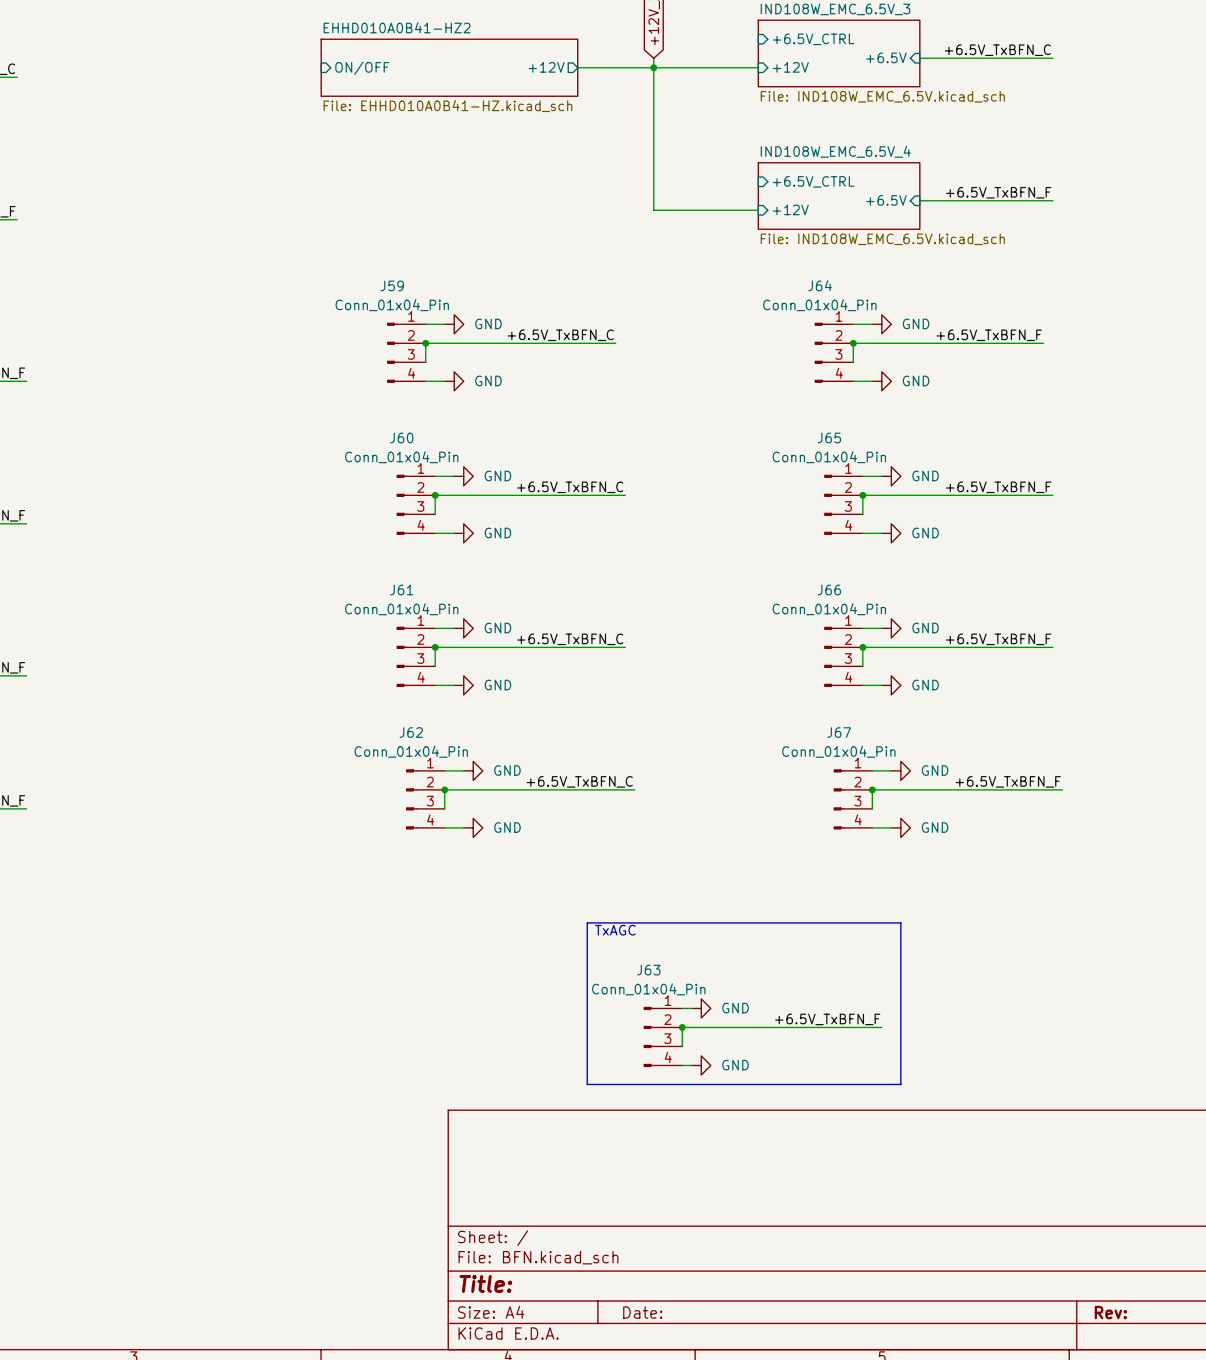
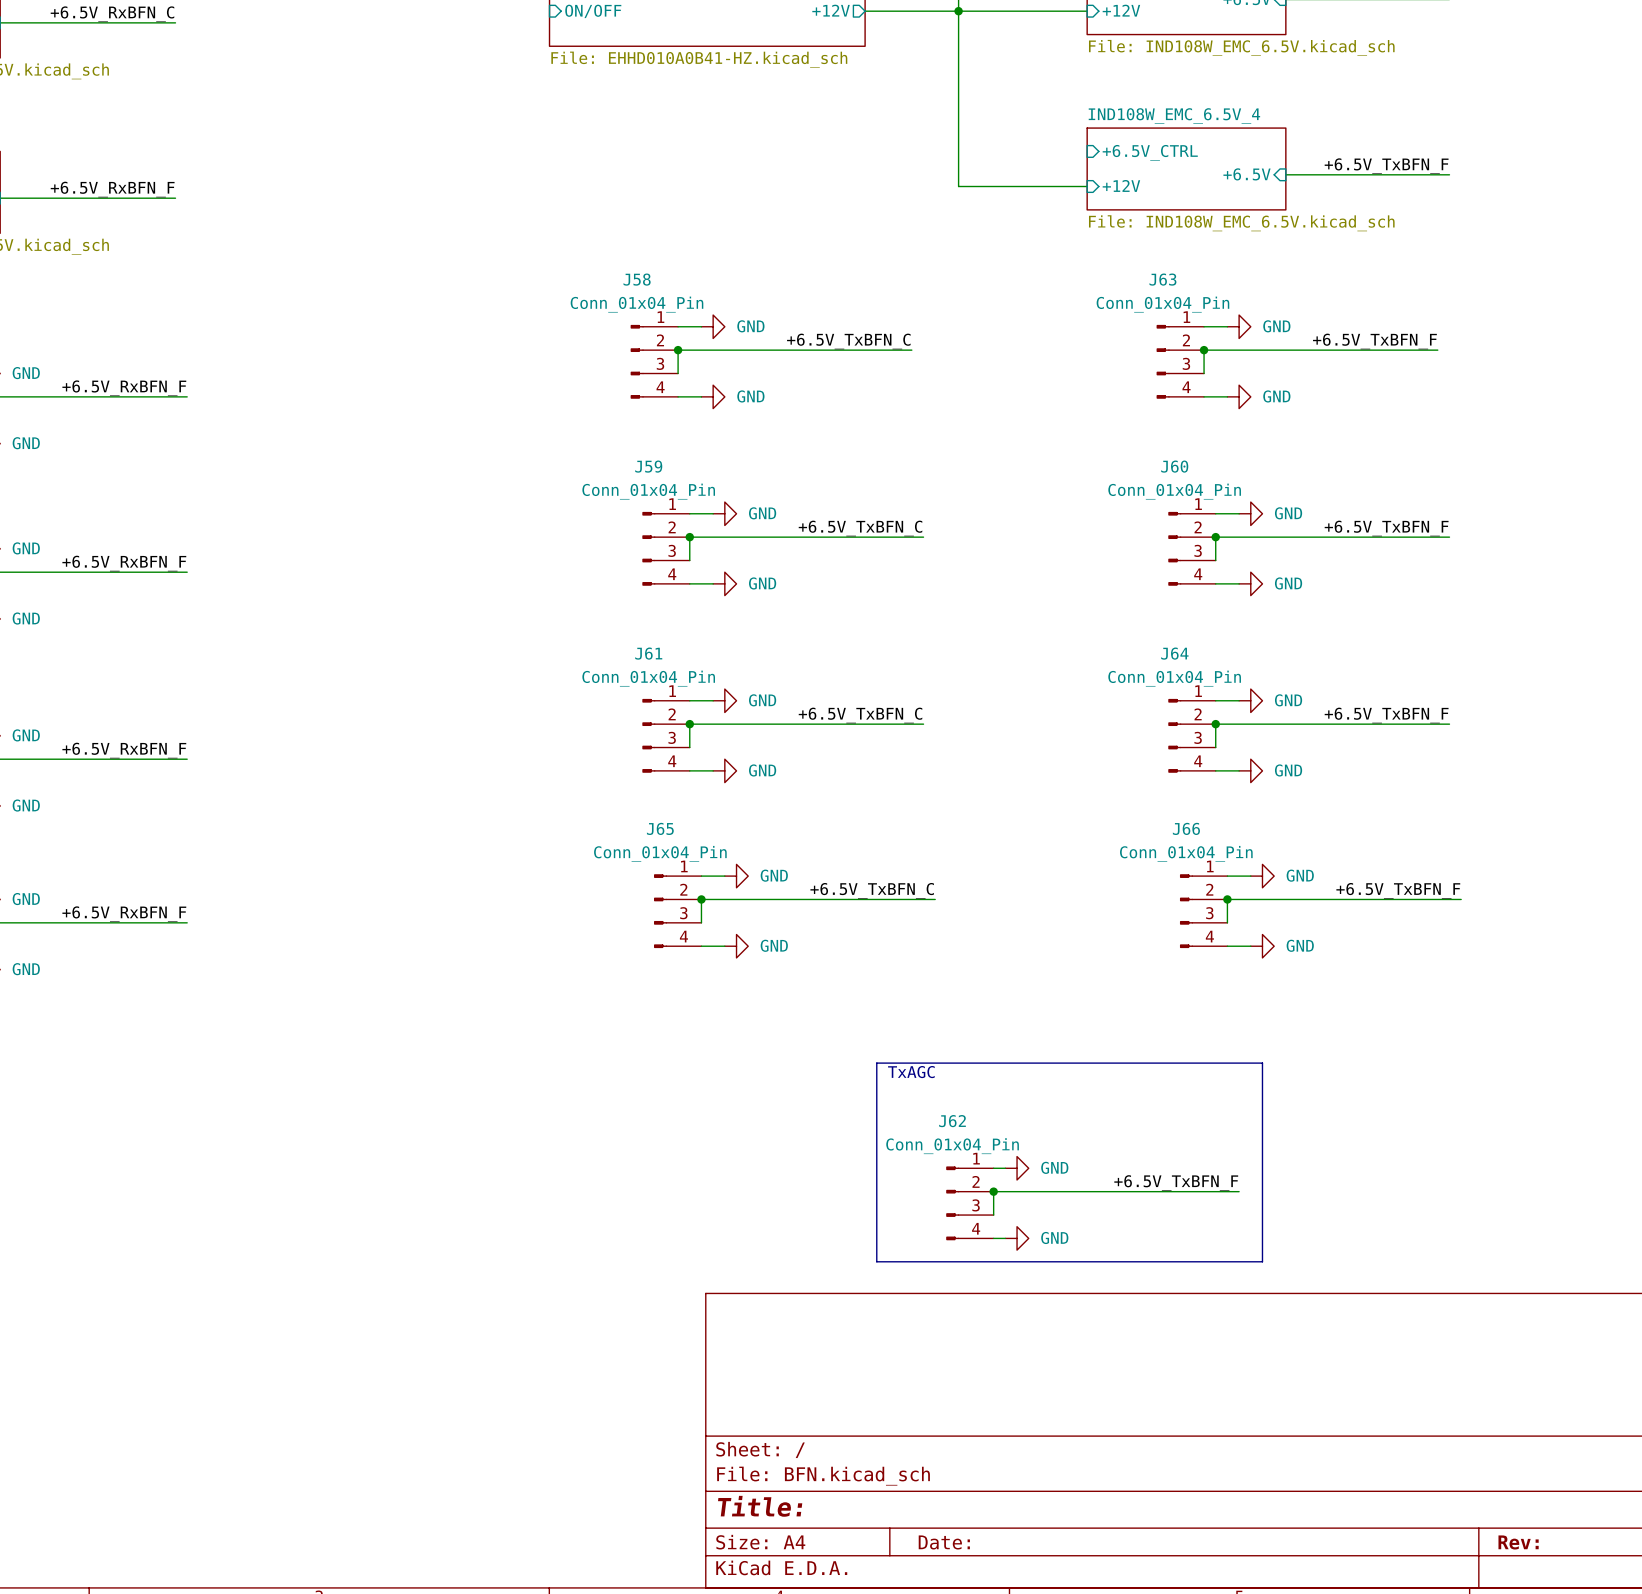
J59 name: J59 (392, 285) -> J58 (637, 279)
J64 name: J64 (820, 285) -> J63 (1162, 279)
J60 name: J60 (401, 437) -> J59 (648, 466)
J65 name: J65 (829, 437) -> J60 (1174, 466)
J66 name: J66 (829, 590) -> J64 (1174, 653)
J62 name: J62 (411, 732) -> J65 (660, 828)
J67 name: J67 (839, 732) -> J66 (1186, 828)
J63 name: J63 (648, 970) -> J62 (952, 1121)

